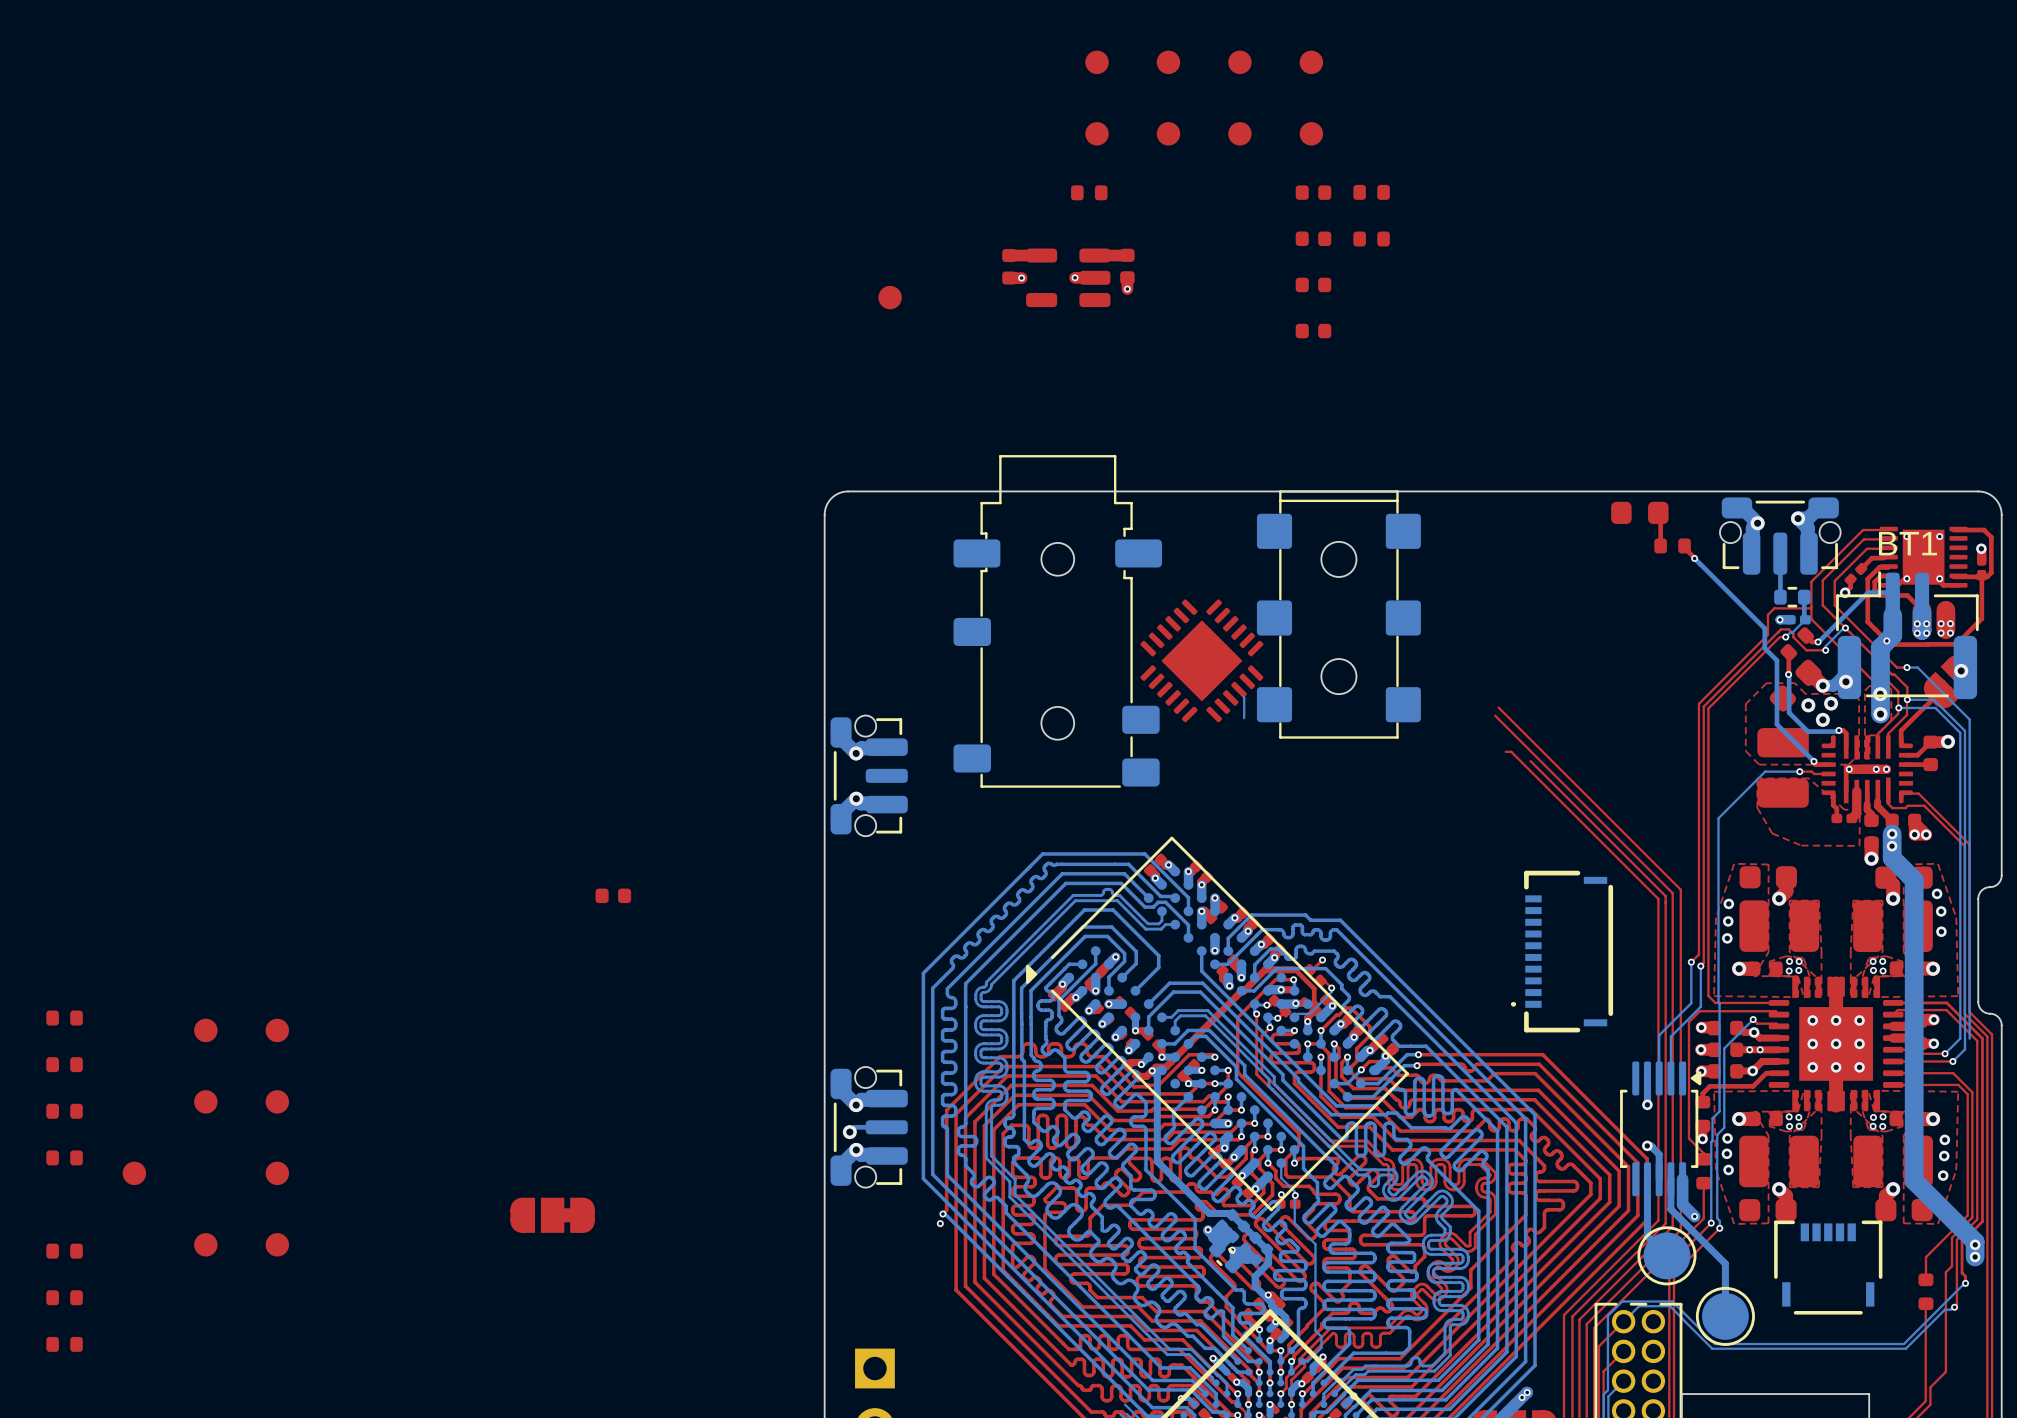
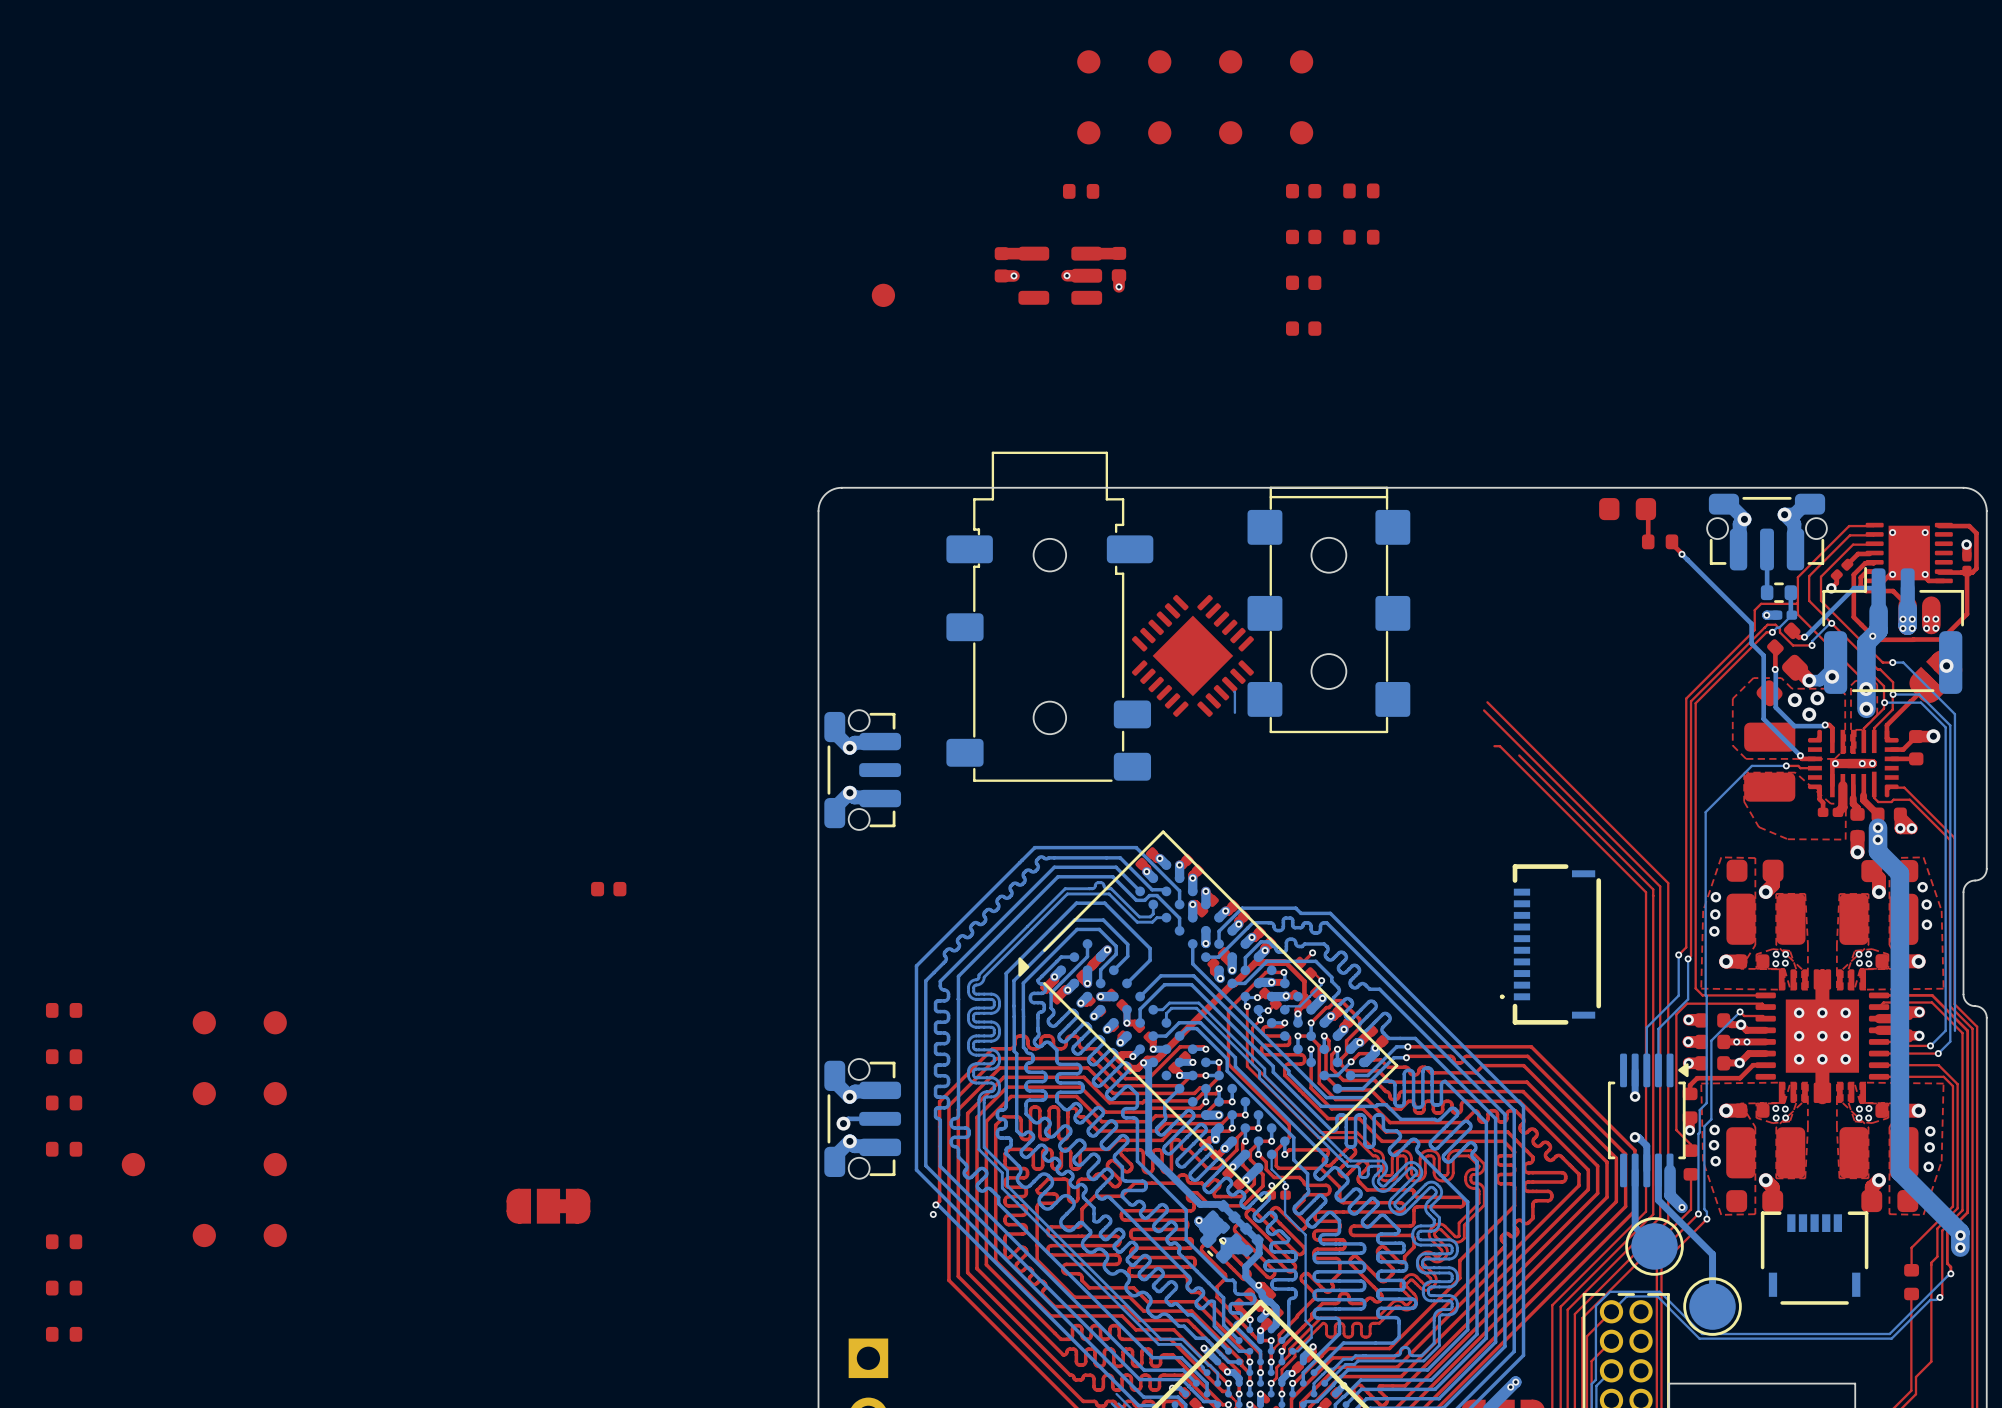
BT1 name: BT1 (1907, 543) -> none

